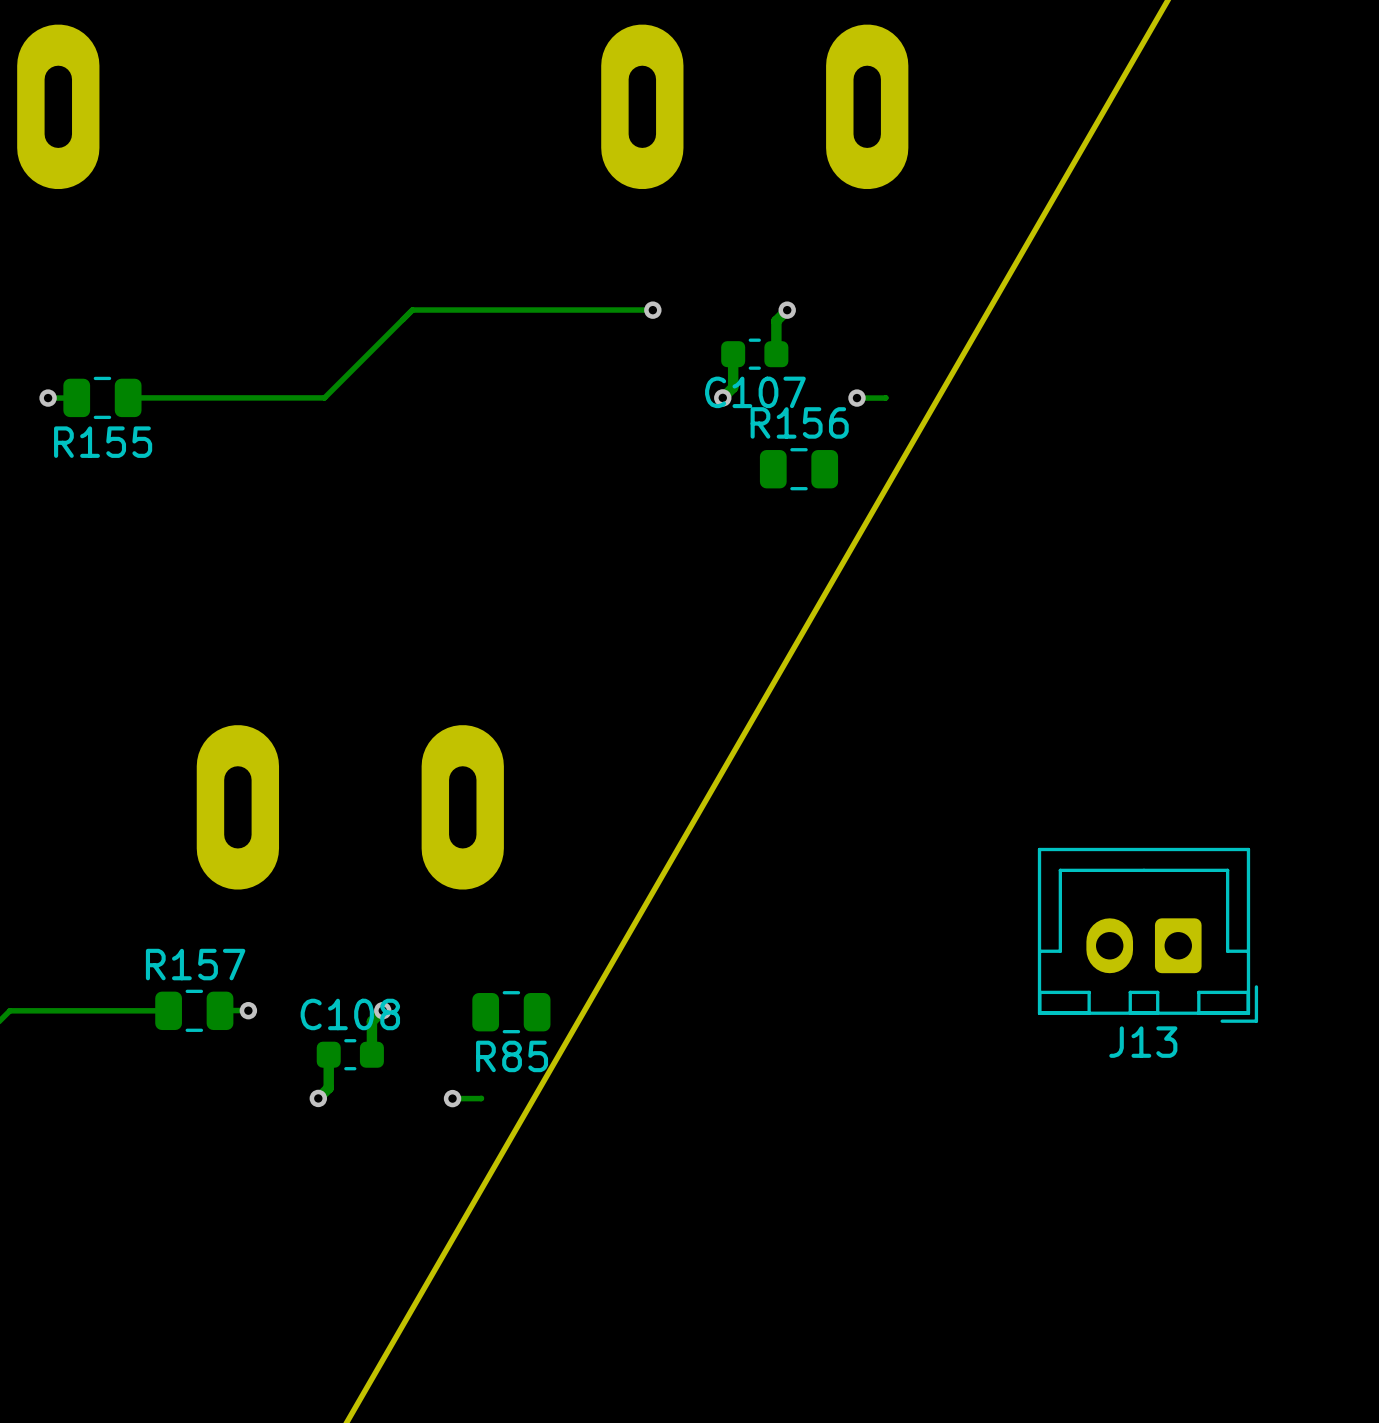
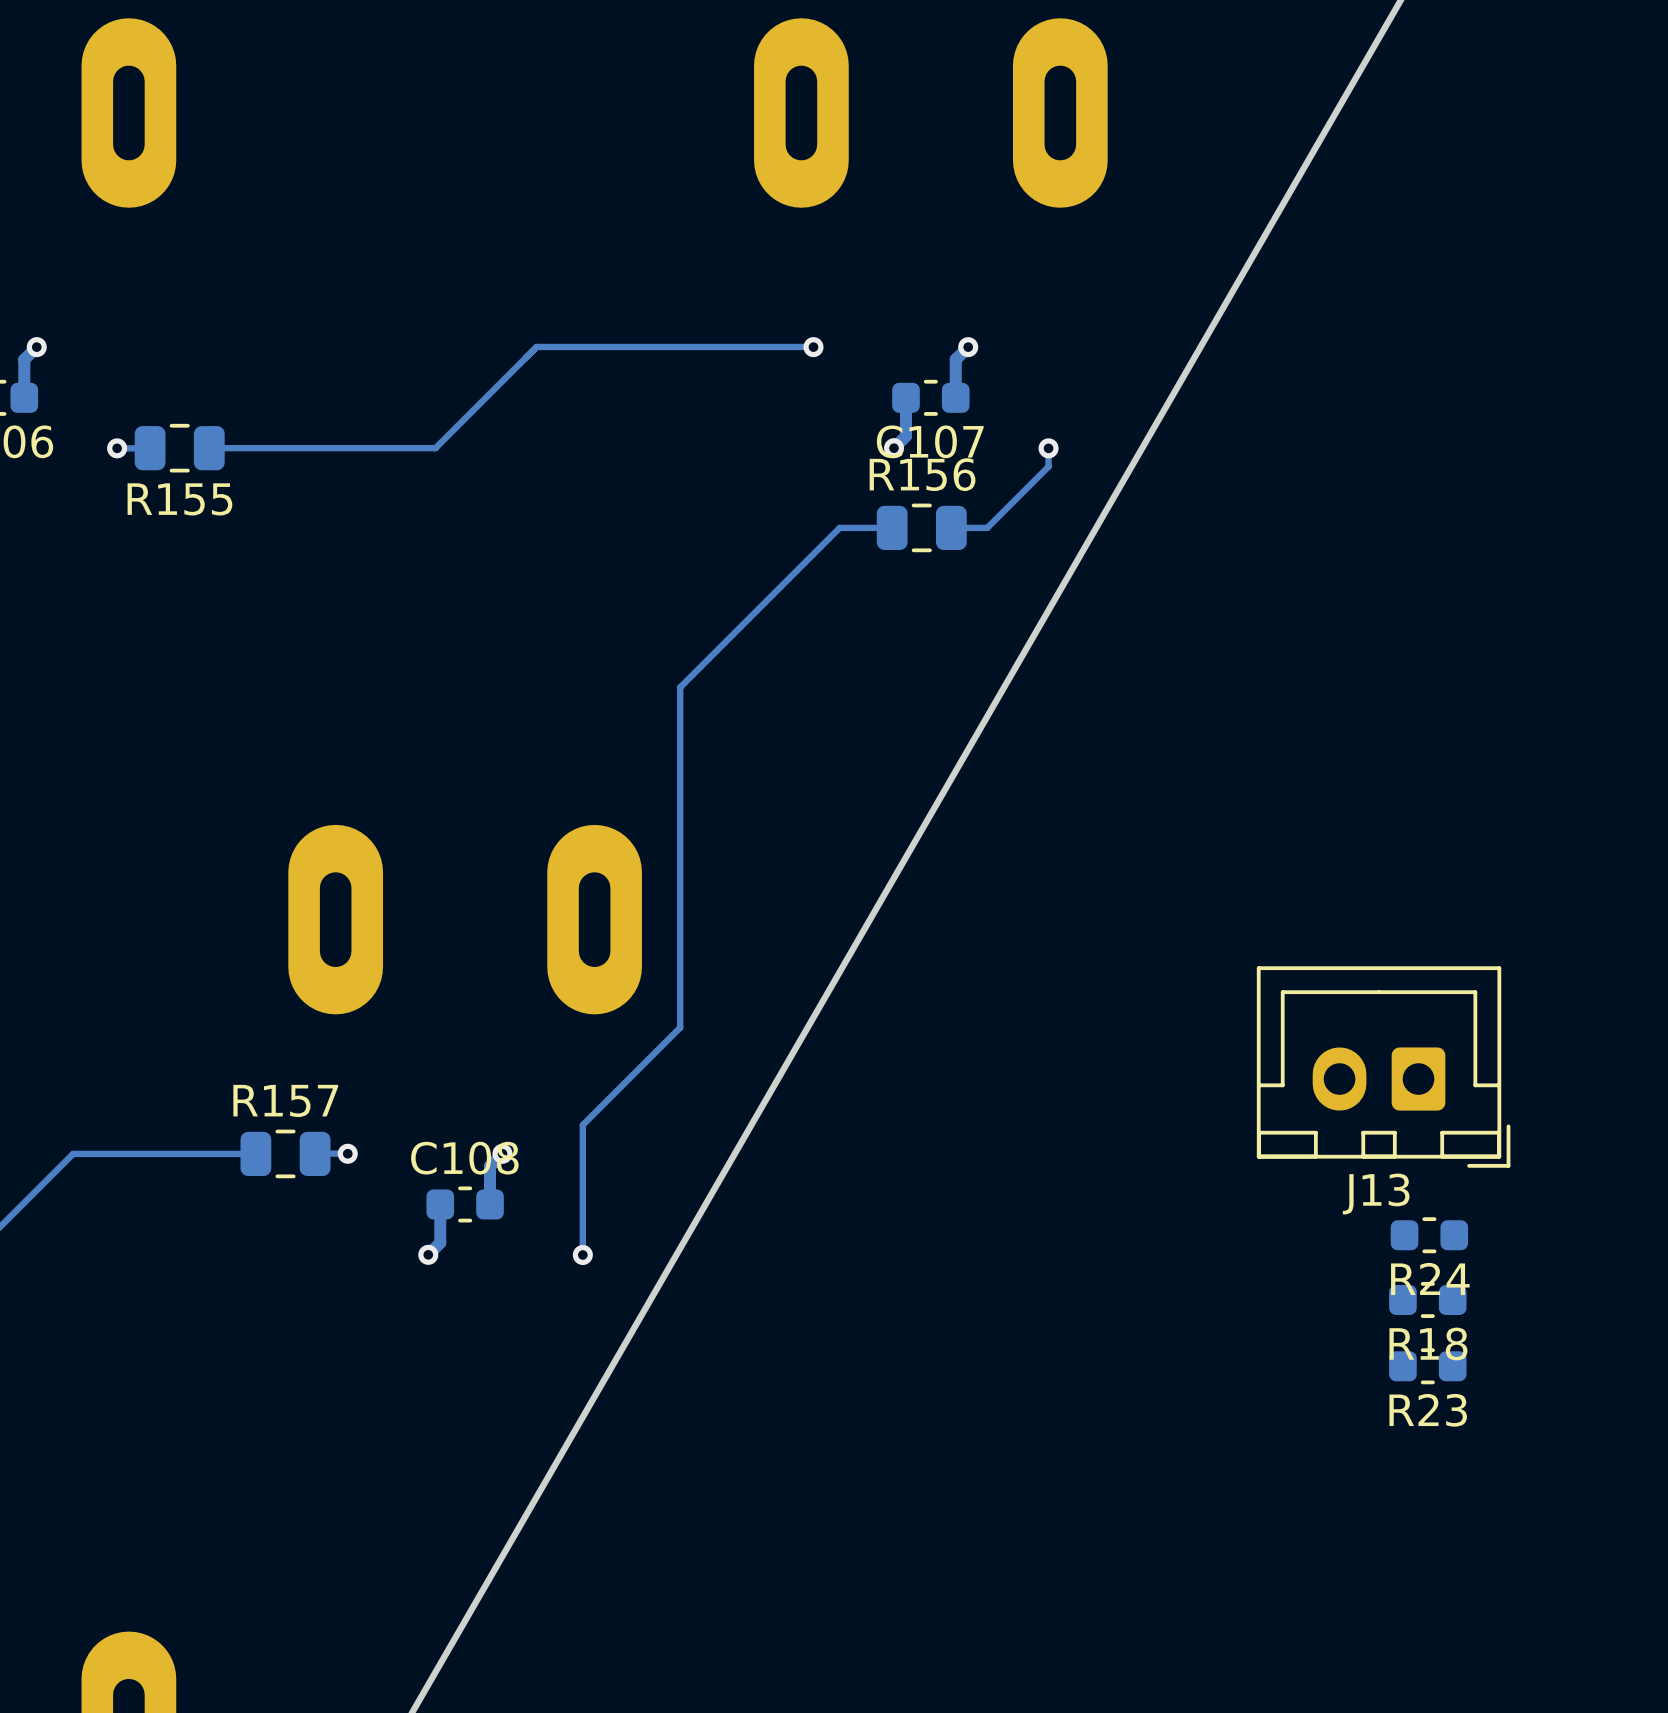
track: (885, 398) (856, 398) -> (951, 527) (987, 527) (1048, 466) (1048, 448)
R156 position: (799, 469) -> (921, 527)
R85: (511, 1012) -> none
R24: none -> (1429, 1235)
track: (481, 1098) (452, 1098) -> (892, 527) (839, 527) (680, 687) (680, 1027) (582, 1125) (582, 1255)
R18: none -> (1427, 1299)
R23: none -> (1427, 1366)

